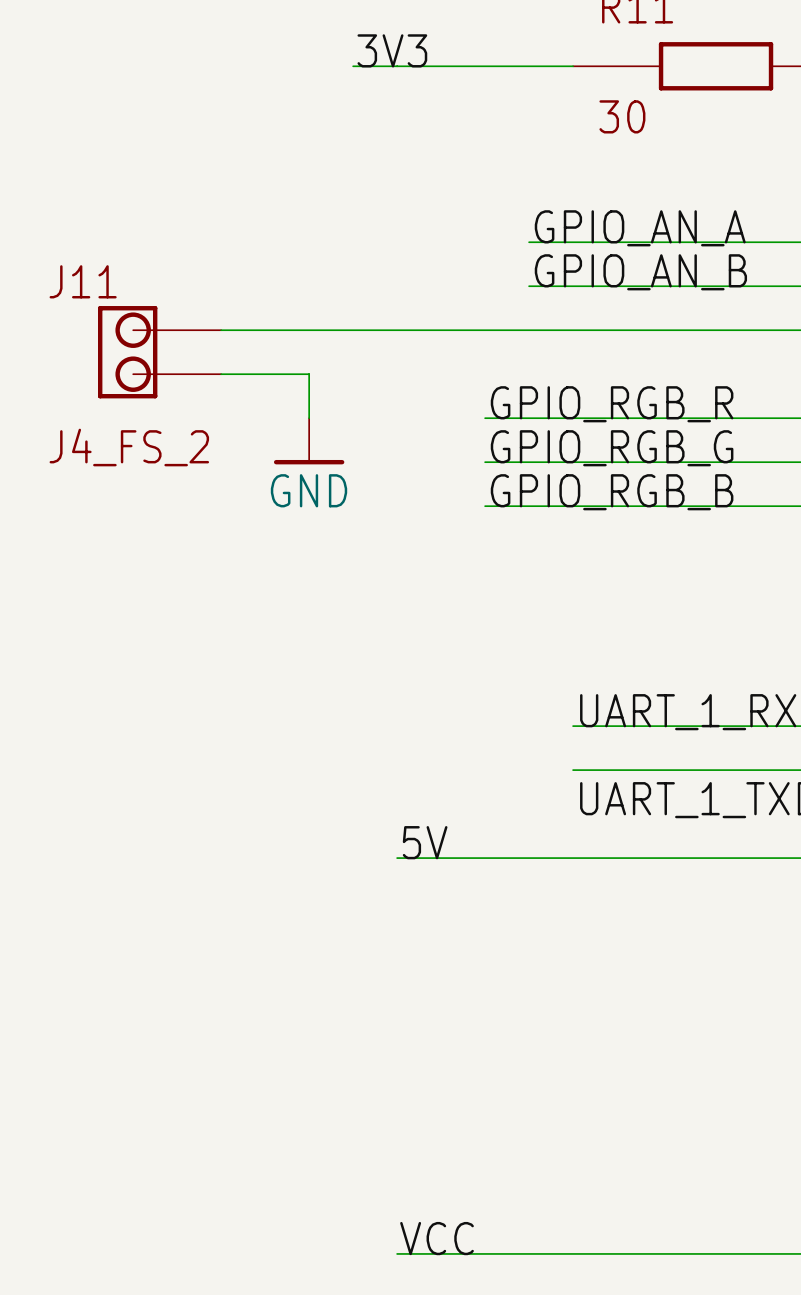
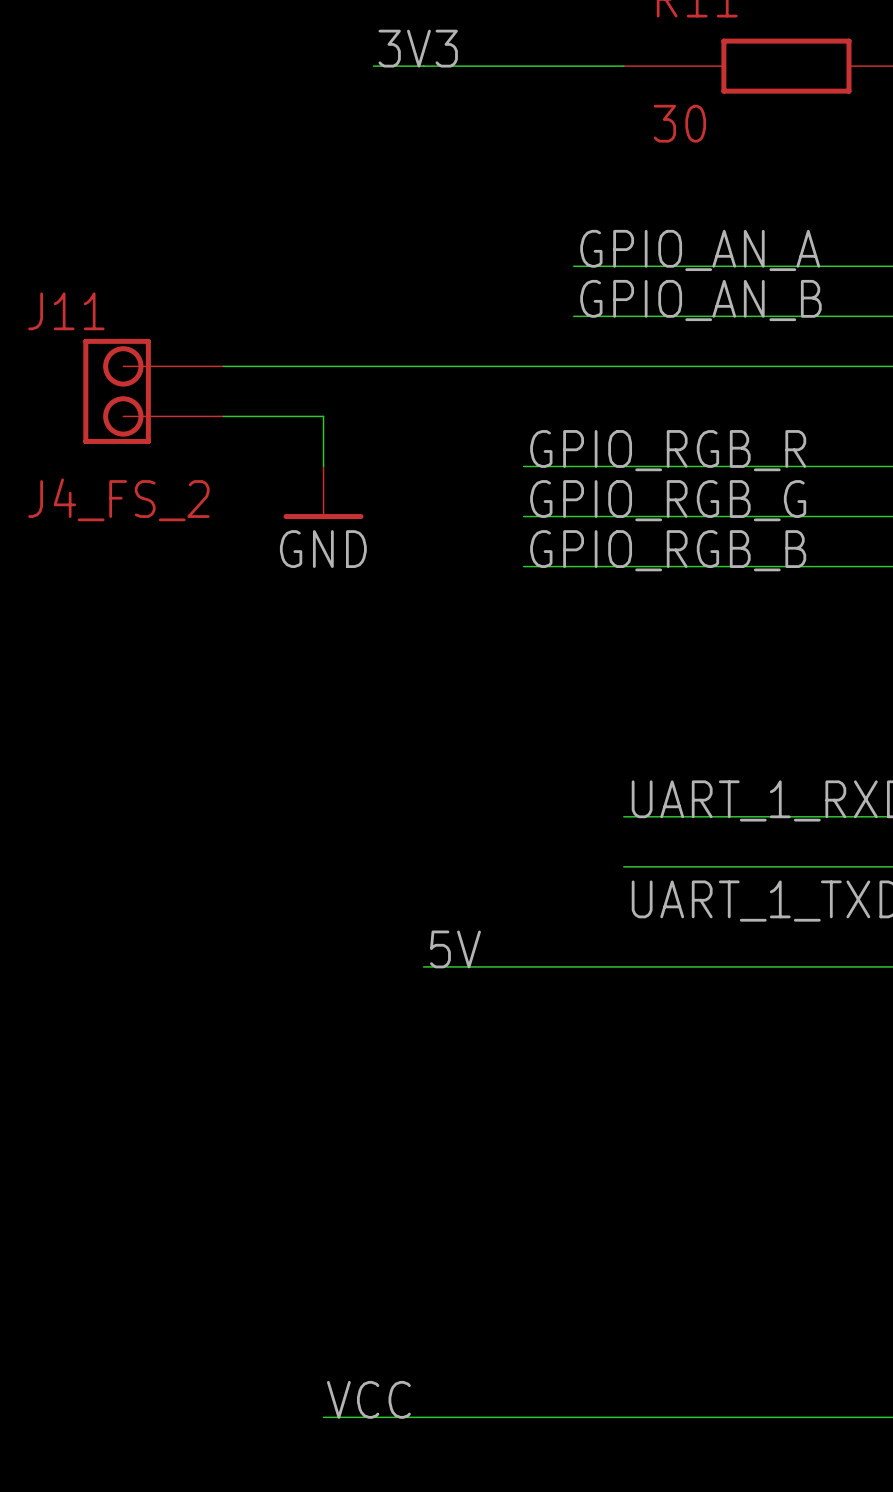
label position: VCC (437, 1238) -> VCC (368, 1399)
wire: none -> (323, 1417) (423, 1417)

